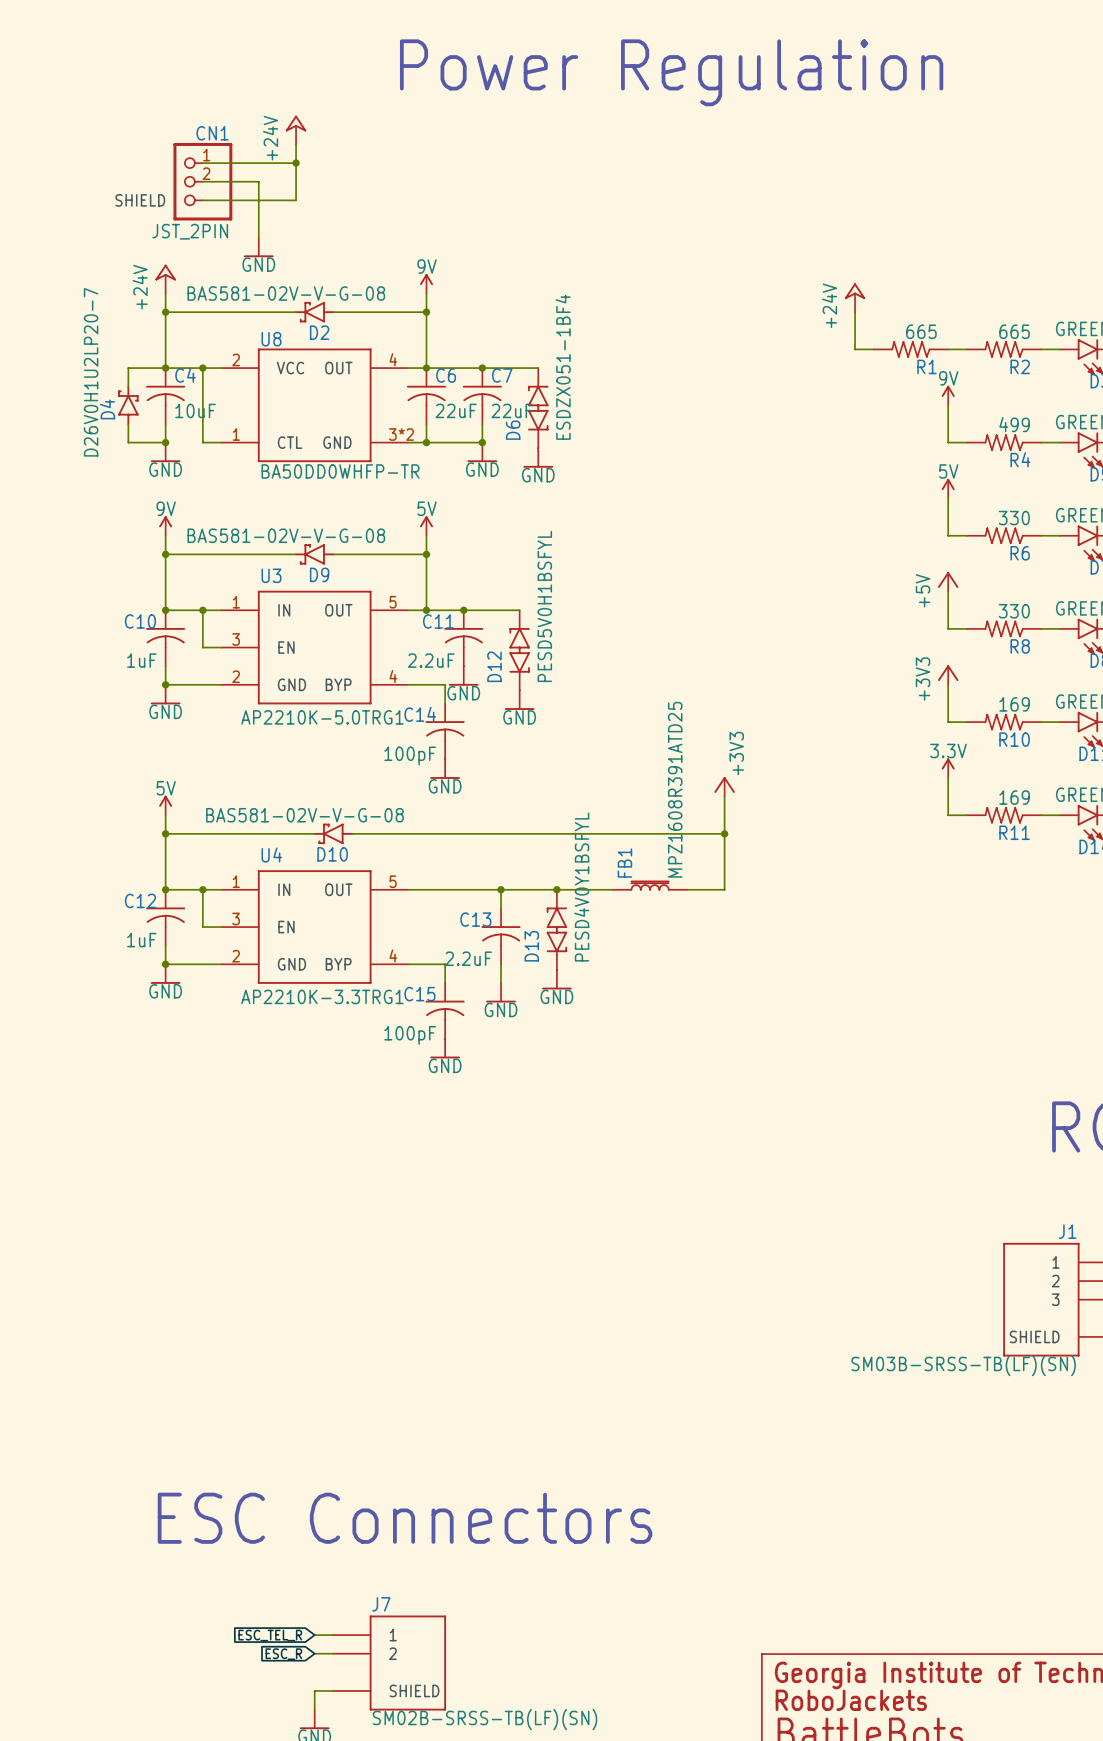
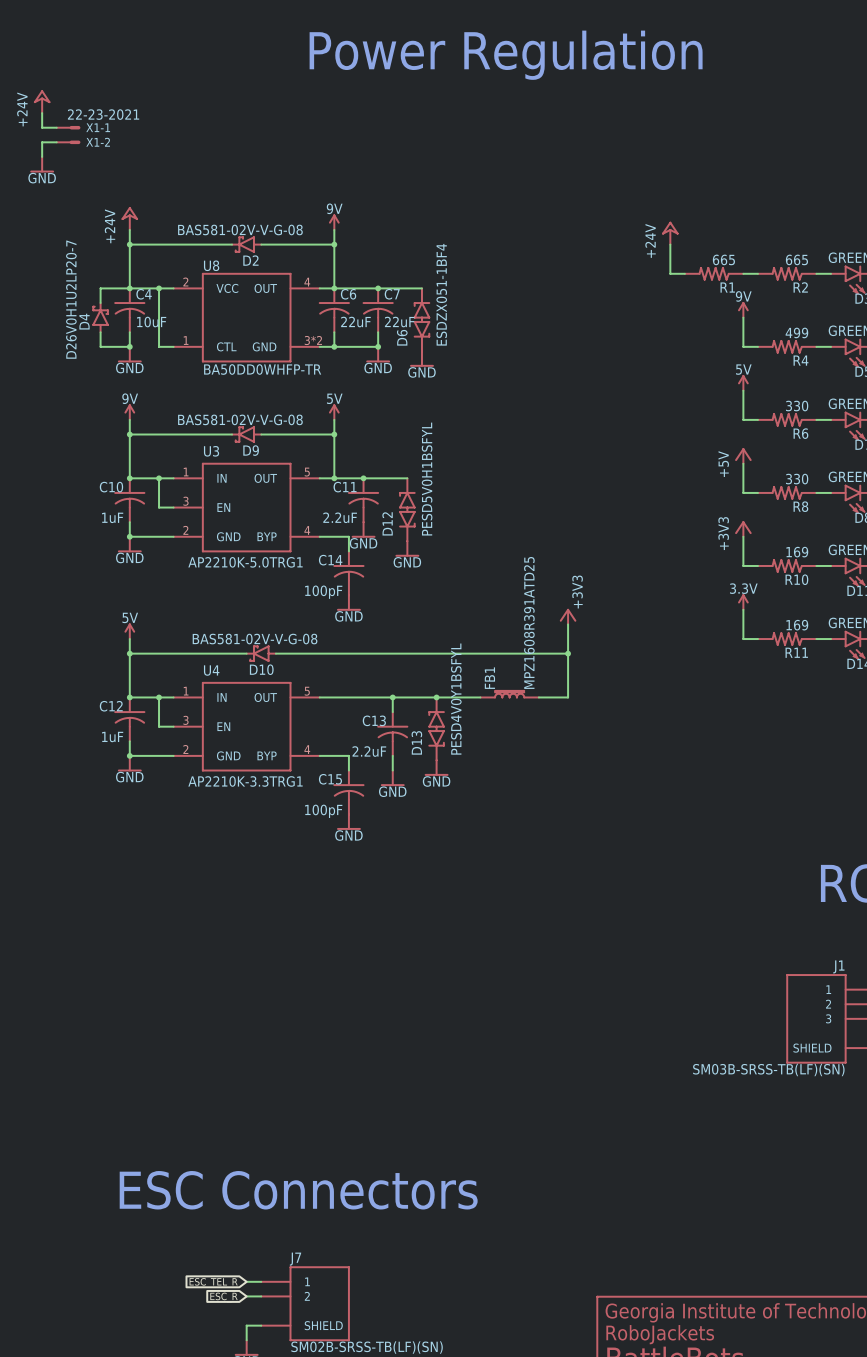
power symbol: none -> +24V (42, 101)
power symbol: +24V (296, 130) -> none
wire: none -> (42, 113) (42, 127) (56, 127)
wire: (296, 144) (296, 200) (202, 200) -> none
X1-1: none -> 22-23-2021 (68, 127)
wire: (202, 163) (296, 163) -> none
junction: (296, 163) -> none
wire: none -> (56, 142) (42, 142) (42, 156)
X1-2: none -> (68, 142)
wire: (202, 181) (258, 181) (258, 237) -> none
CN1: JST_2PIN (202, 181) -> none
power symbol: none -> GND (42, 164)
power symbol: GND (258, 247) -> none

